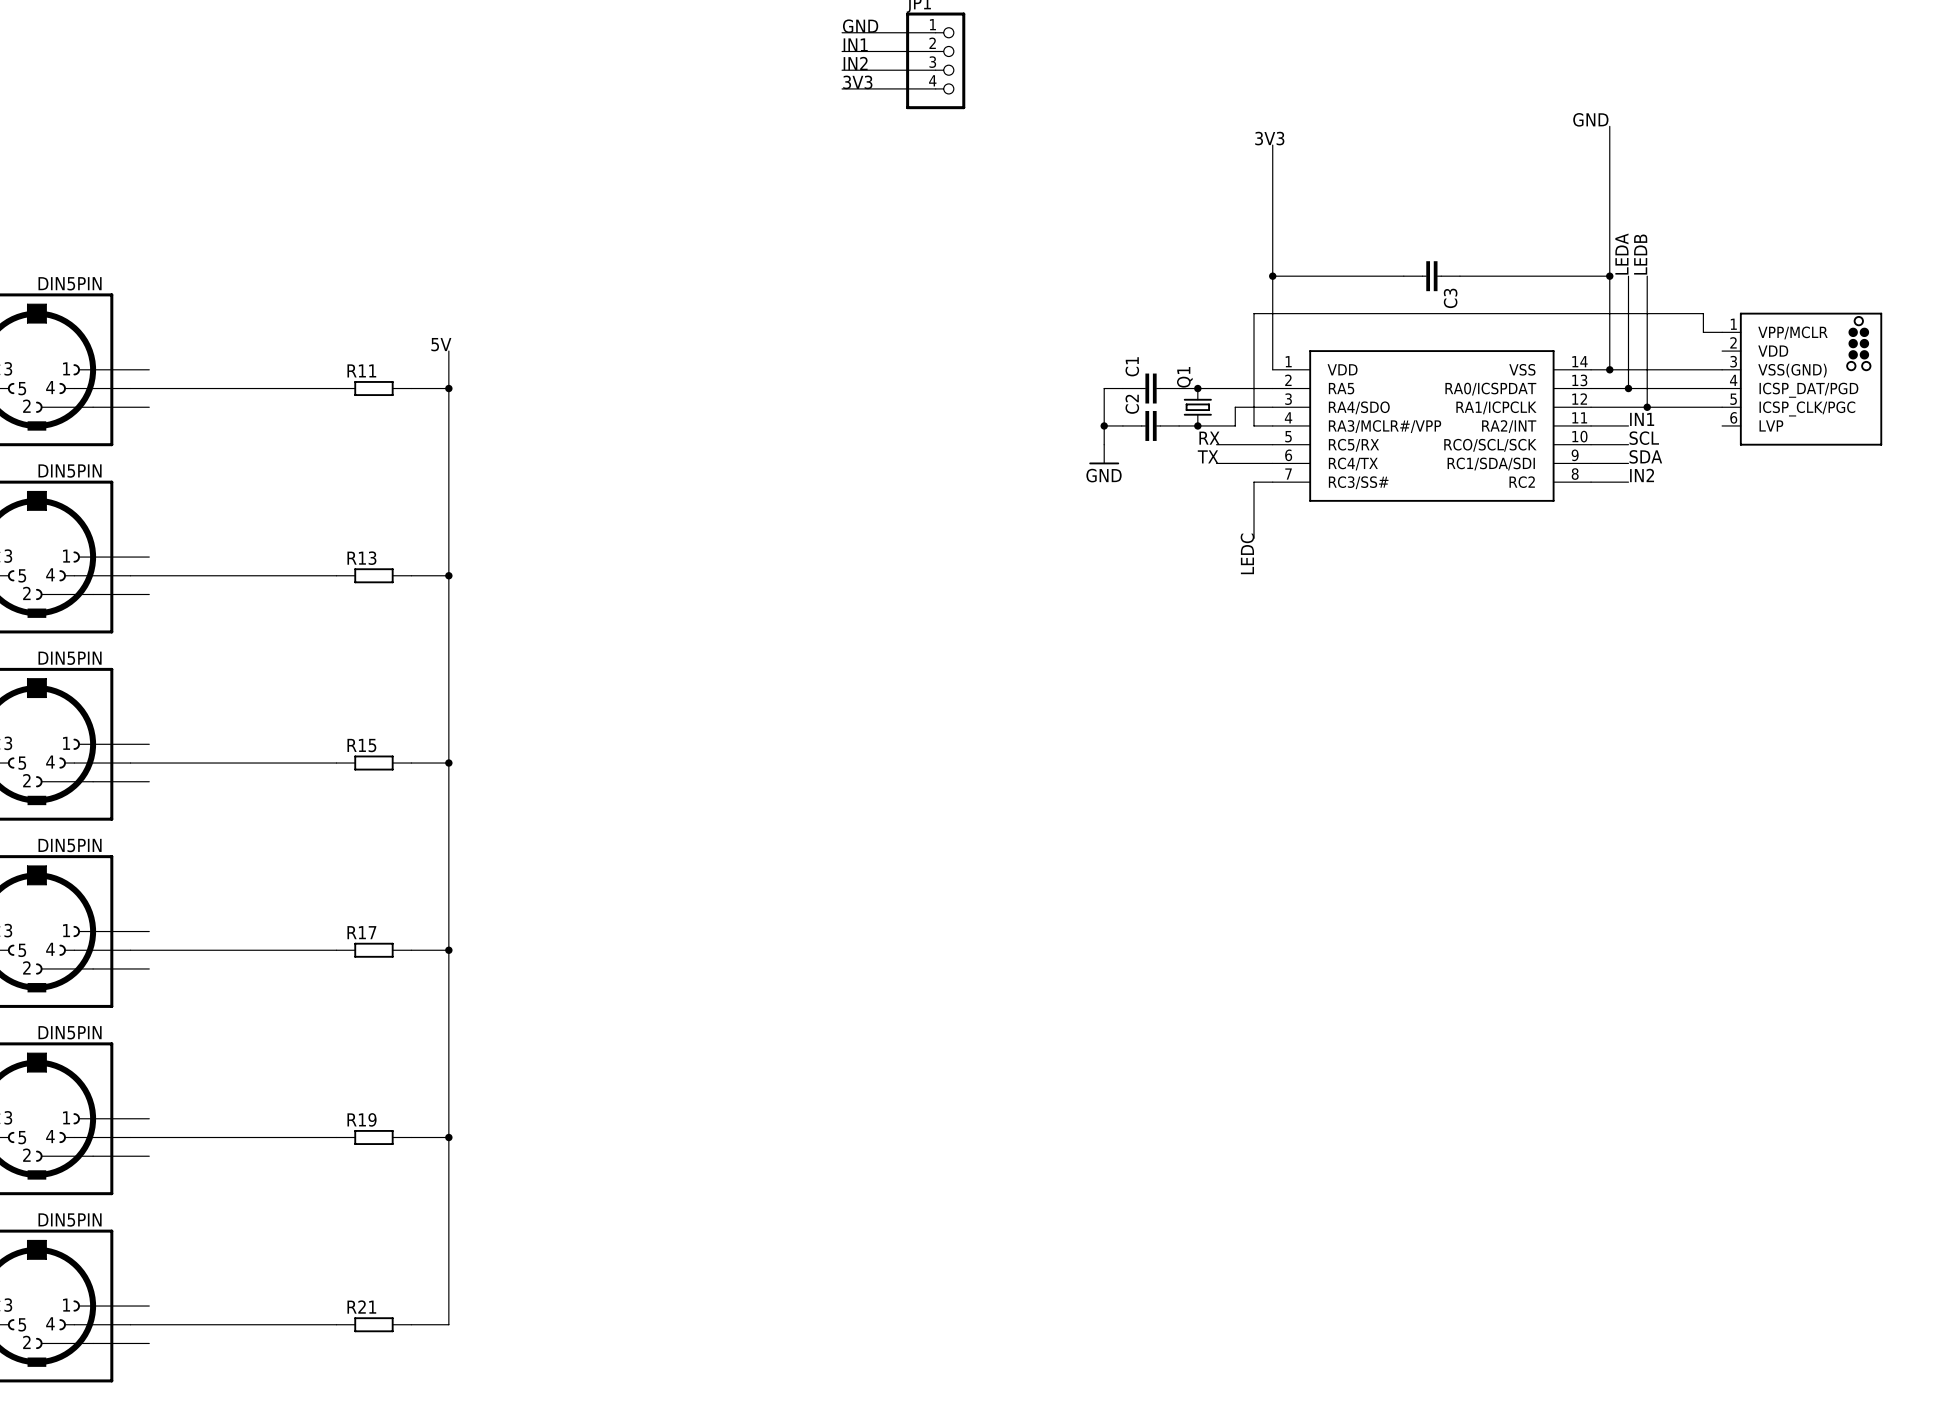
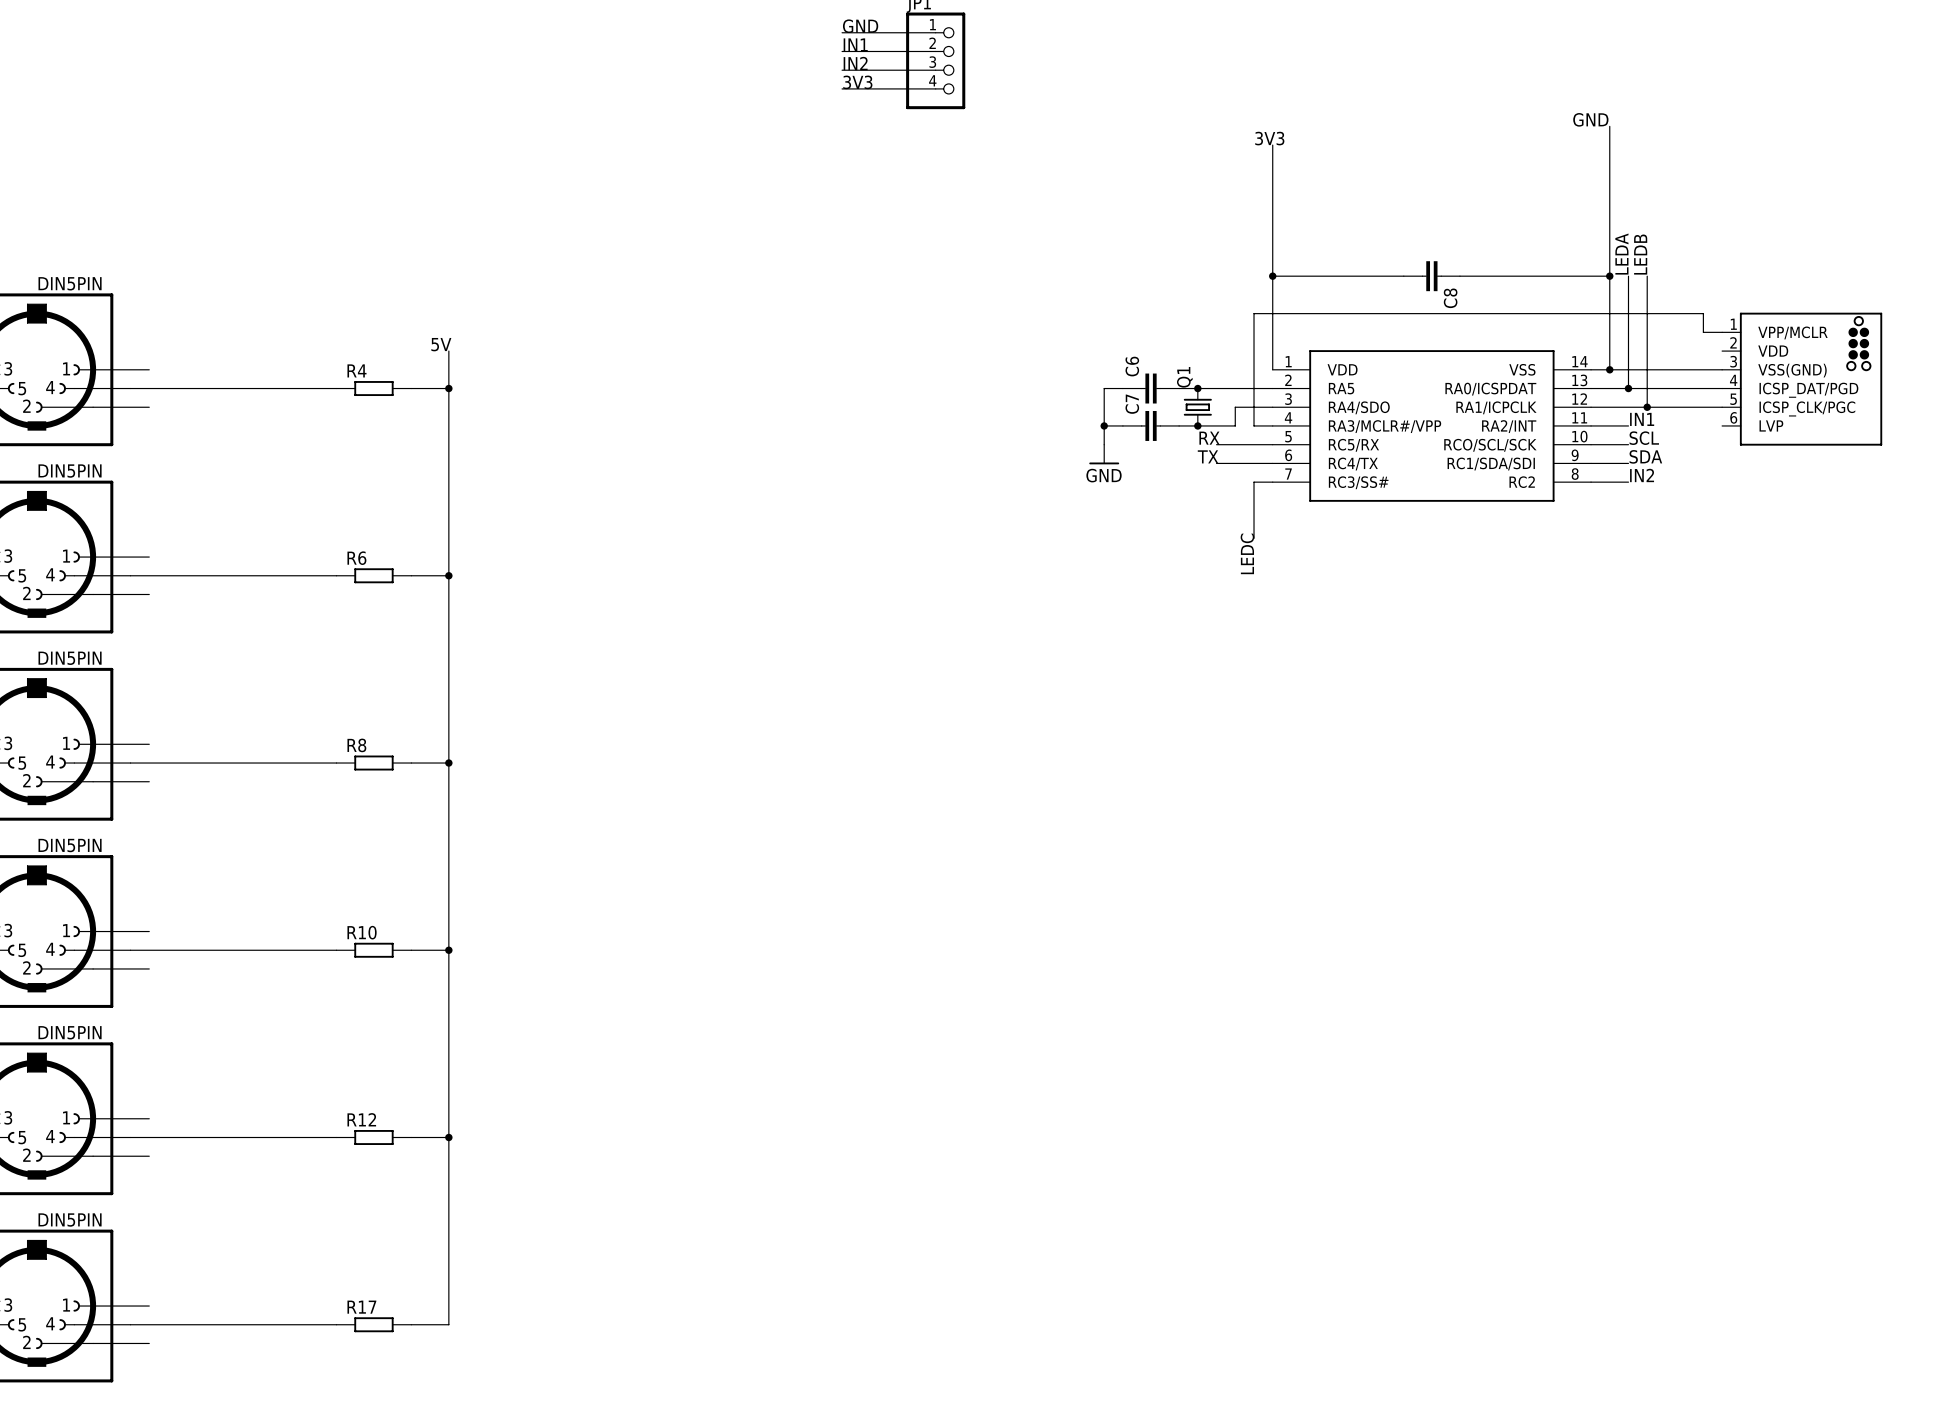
C3 name: C3 (1450, 298) -> C8 (1450, 298)
C1 name: C1 (1132, 366) -> C6 (1132, 366)
R11 name: R11 (361, 370) -> R4 (356, 370)
C2 name: C2 (1132, 404) -> C7 (1132, 404)
R13 name: R13 (361, 558) -> R6 (356, 558)
R15 name: R15 (361, 745) -> R8 (356, 745)
R17 name: R17 (361, 932) -> R10 (362, 932)
R19 name: R19 (362, 1119) -> R12 (361, 1119)
R21 name: R21 (361, 1307) -> R17 (361, 1307)

